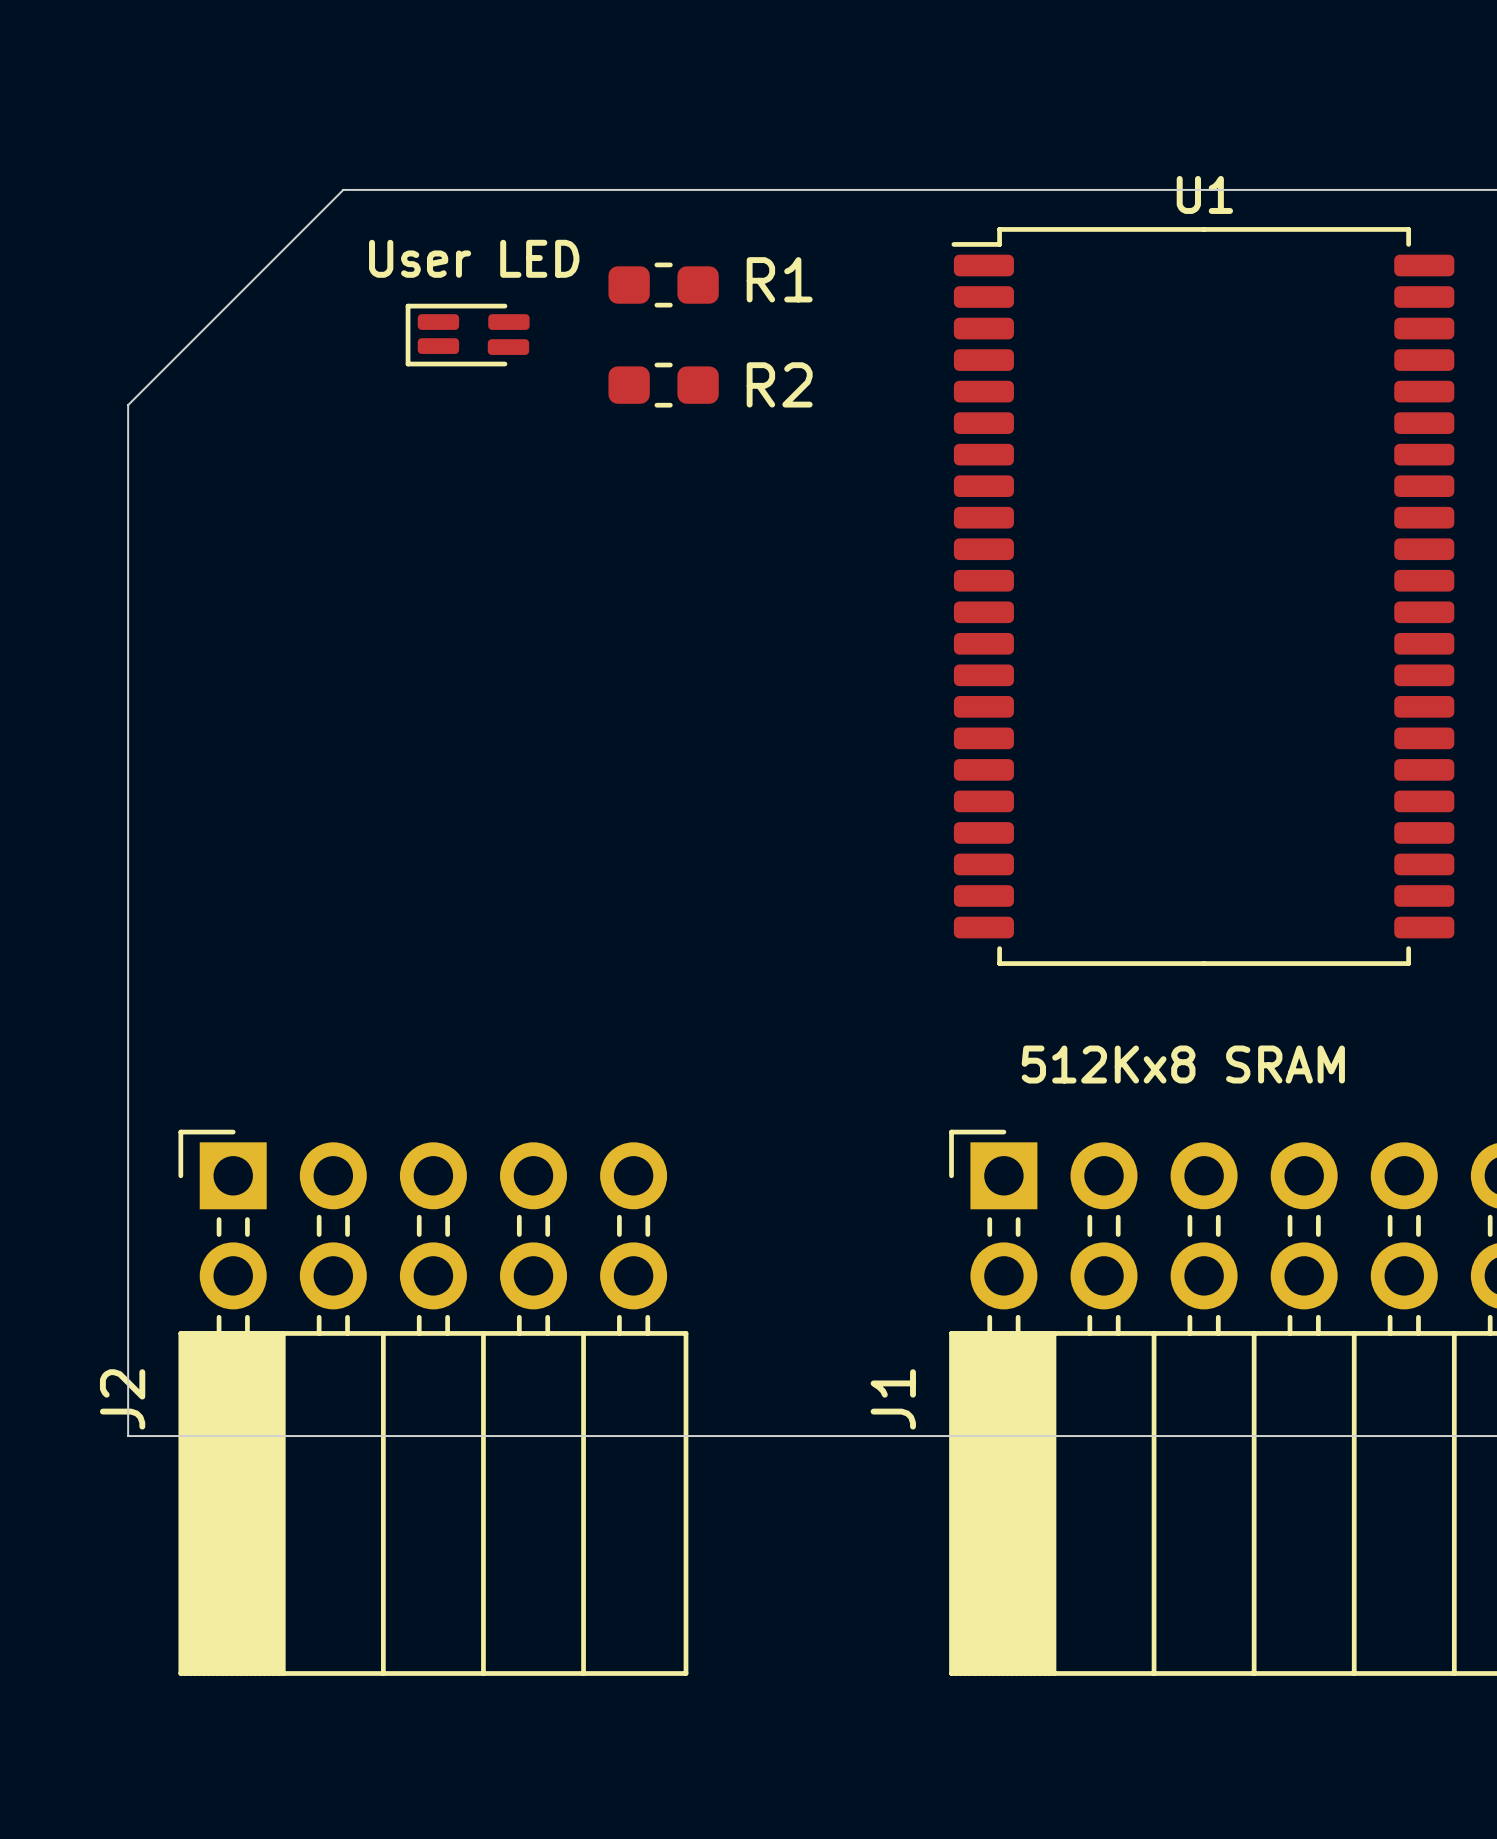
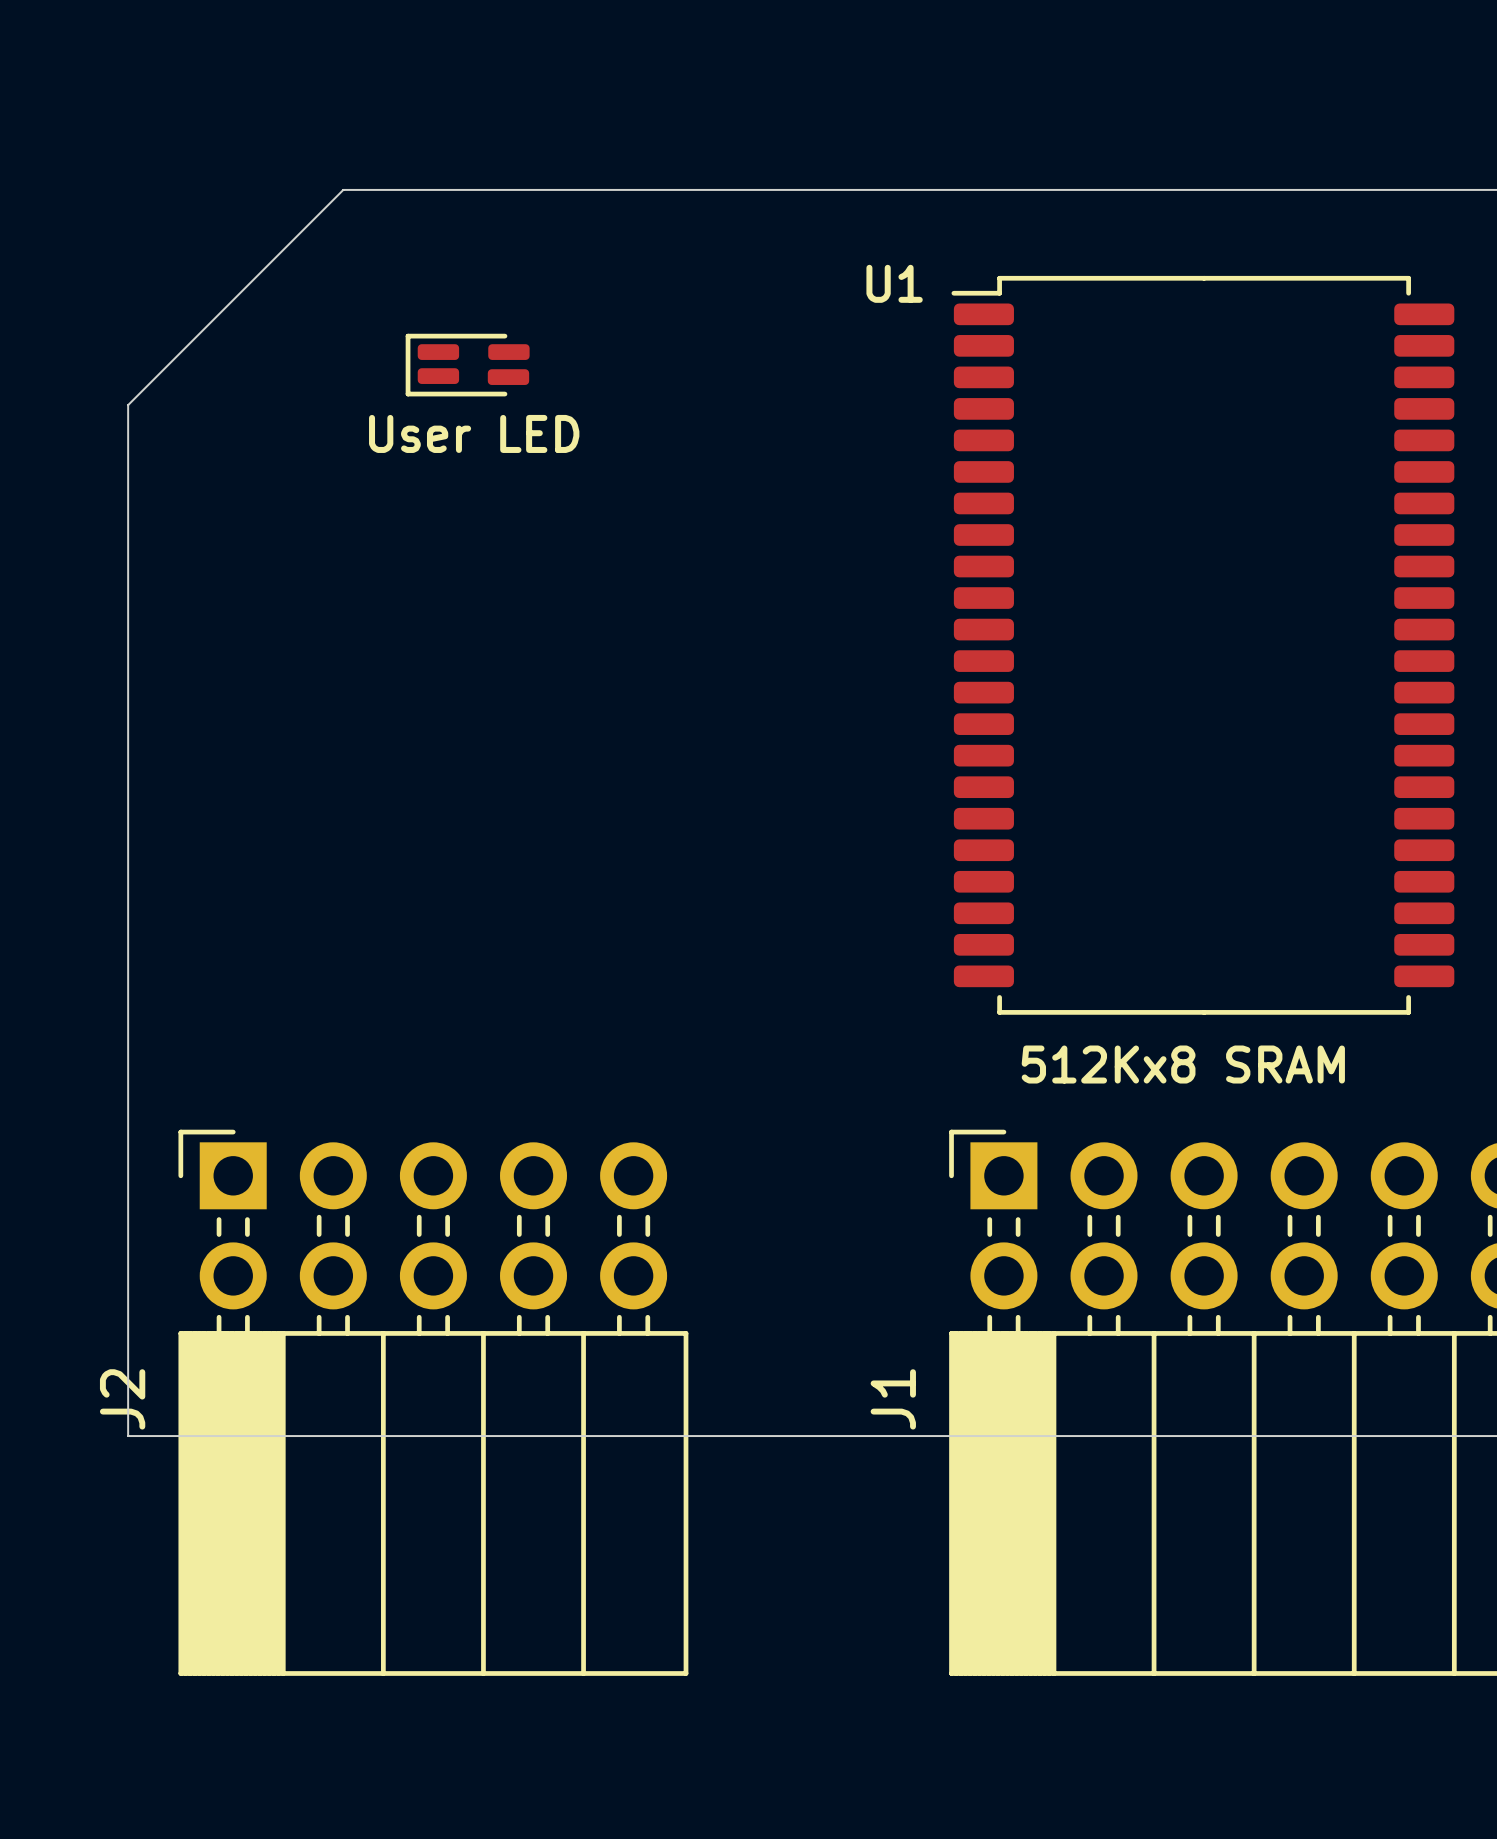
U1 name position: U1 (1204, 194) -> U1 (894, 283)
text position: User LED (474, 258) -> User LED (474, 433)
R1: (663, 285) -> none
part position: (467, 335) -> (467, 365)
R2: (663, 385) -> none
U1 position: (1202, 596) -> (1202, 645)

